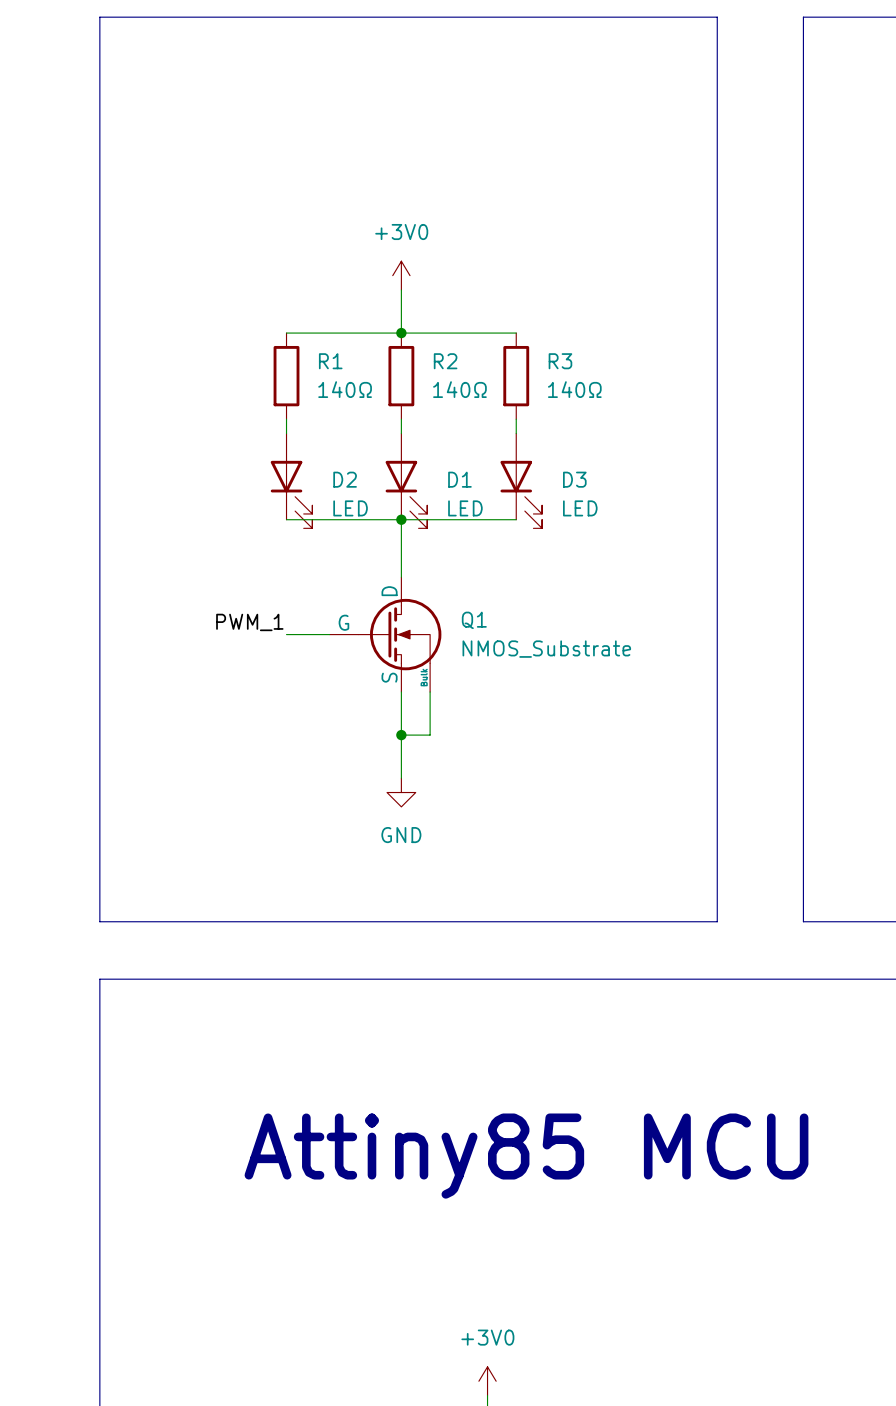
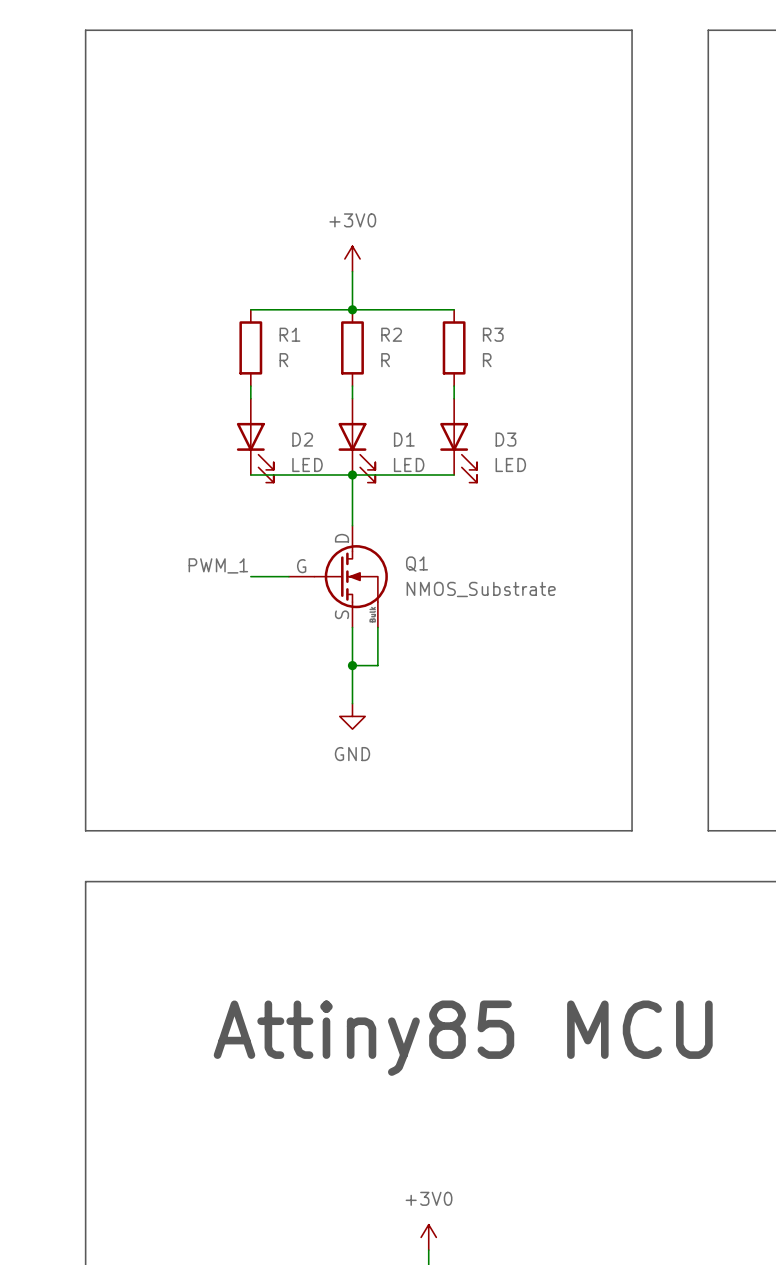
R1 value: 140Ω (345, 389) -> R (283, 360)
R2 value: 140Ω (459, 389) -> R (385, 360)
R3 value: 140Ω (574, 389) -> R (487, 360)

